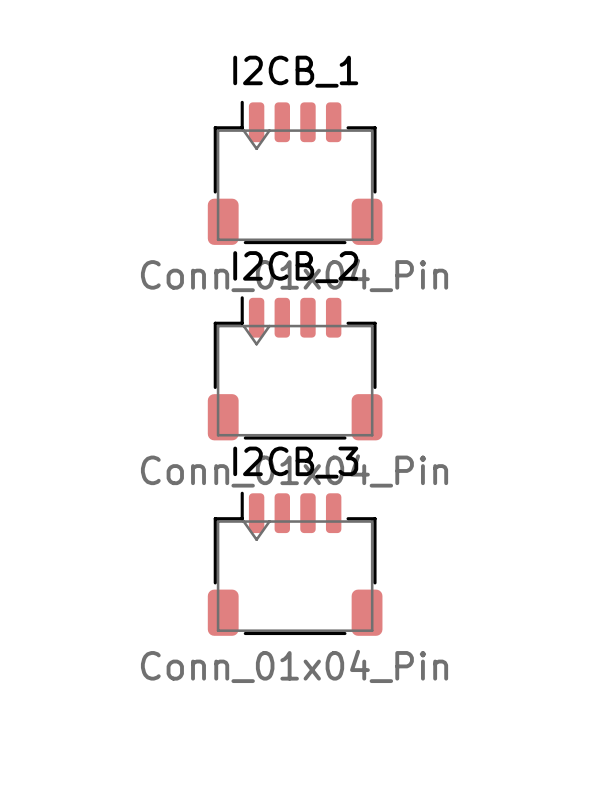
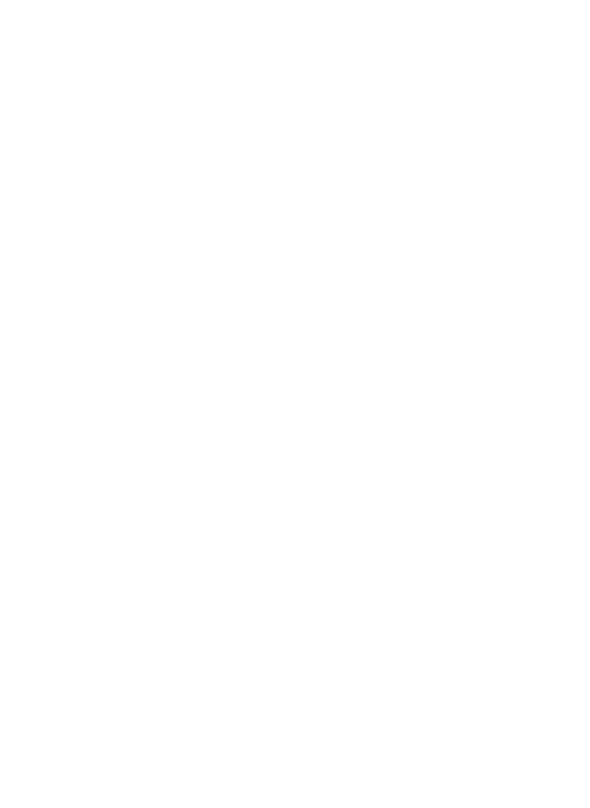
I2CB_1: Conn_01x04_Pin (295, 172) -> none
I2CB_2: Conn_01x04_Pin (295, 368) -> none
I2CB_3: Conn_01x04_Pin (295, 563) -> none

